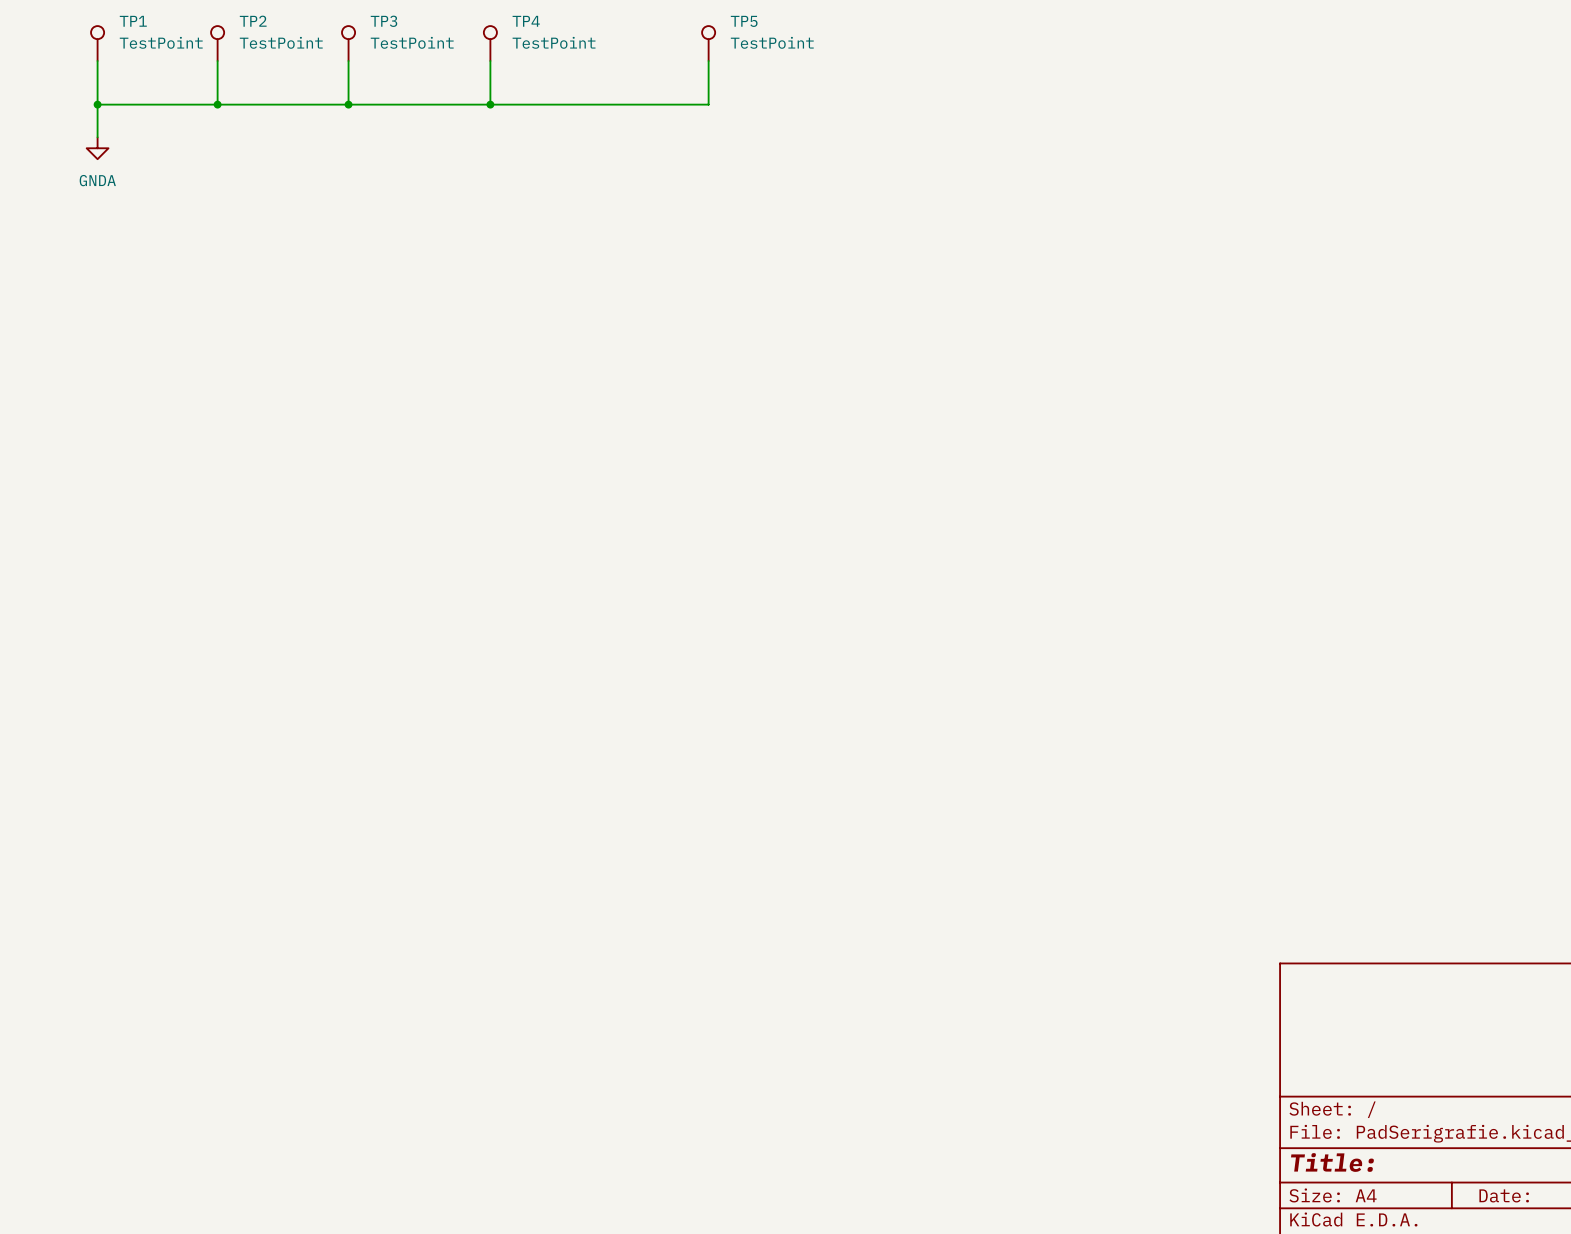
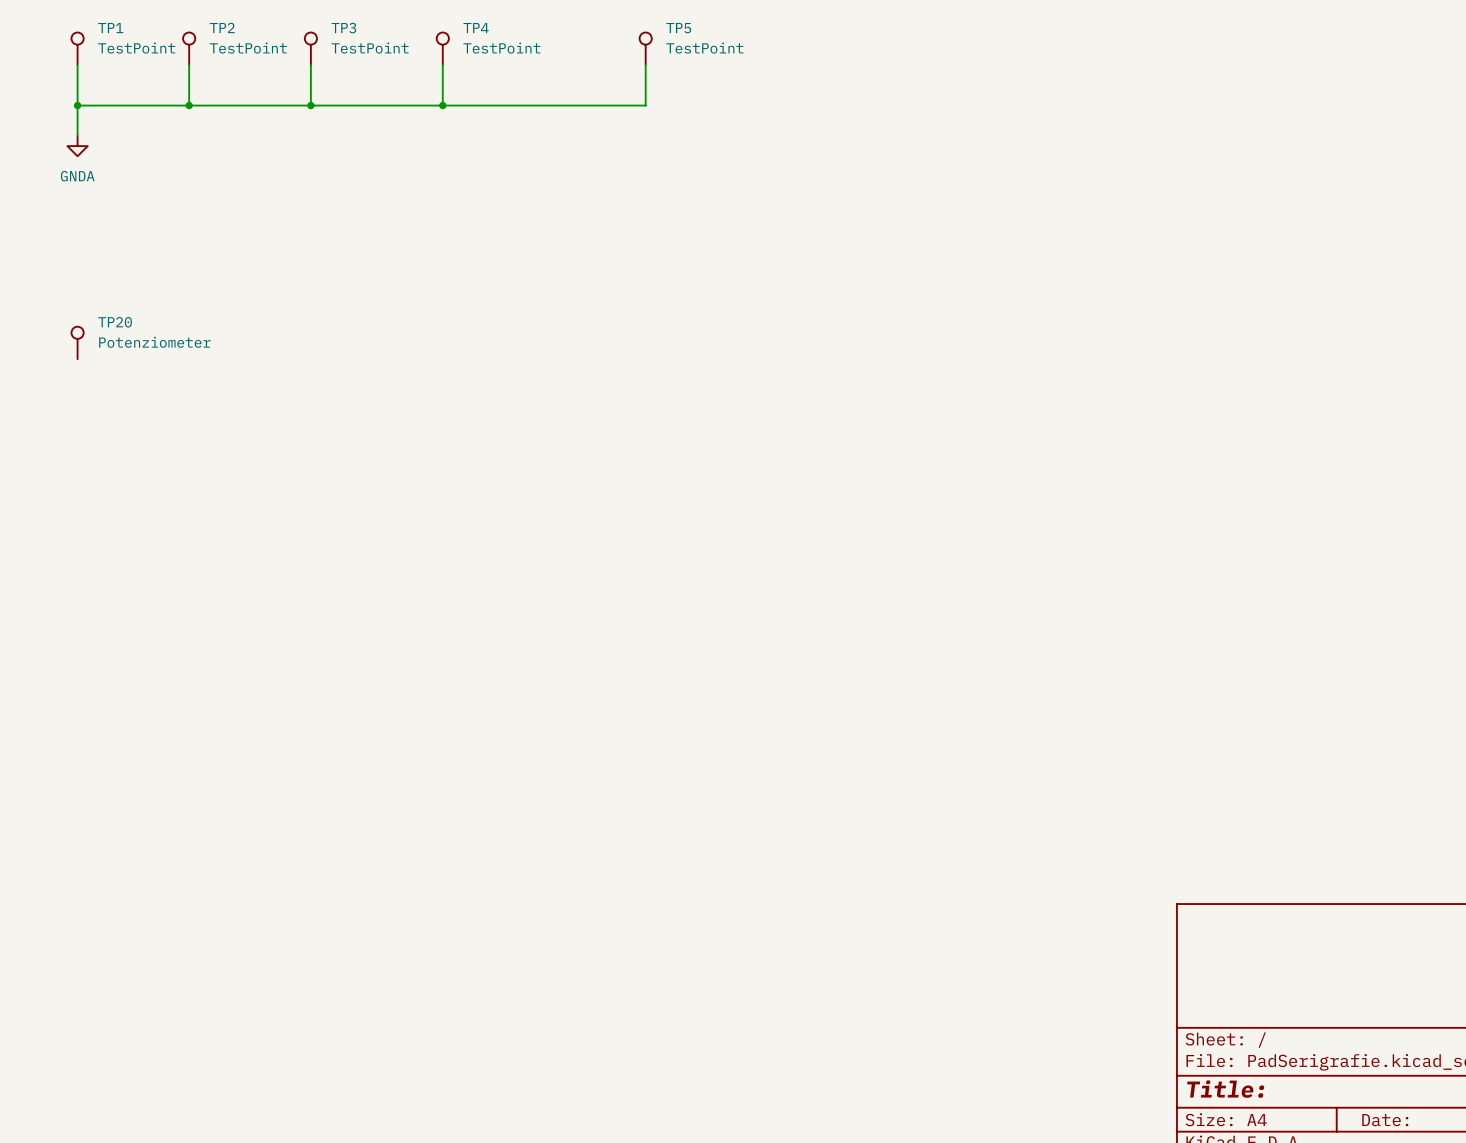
TP20: none -> Potenziometer (77, 342)

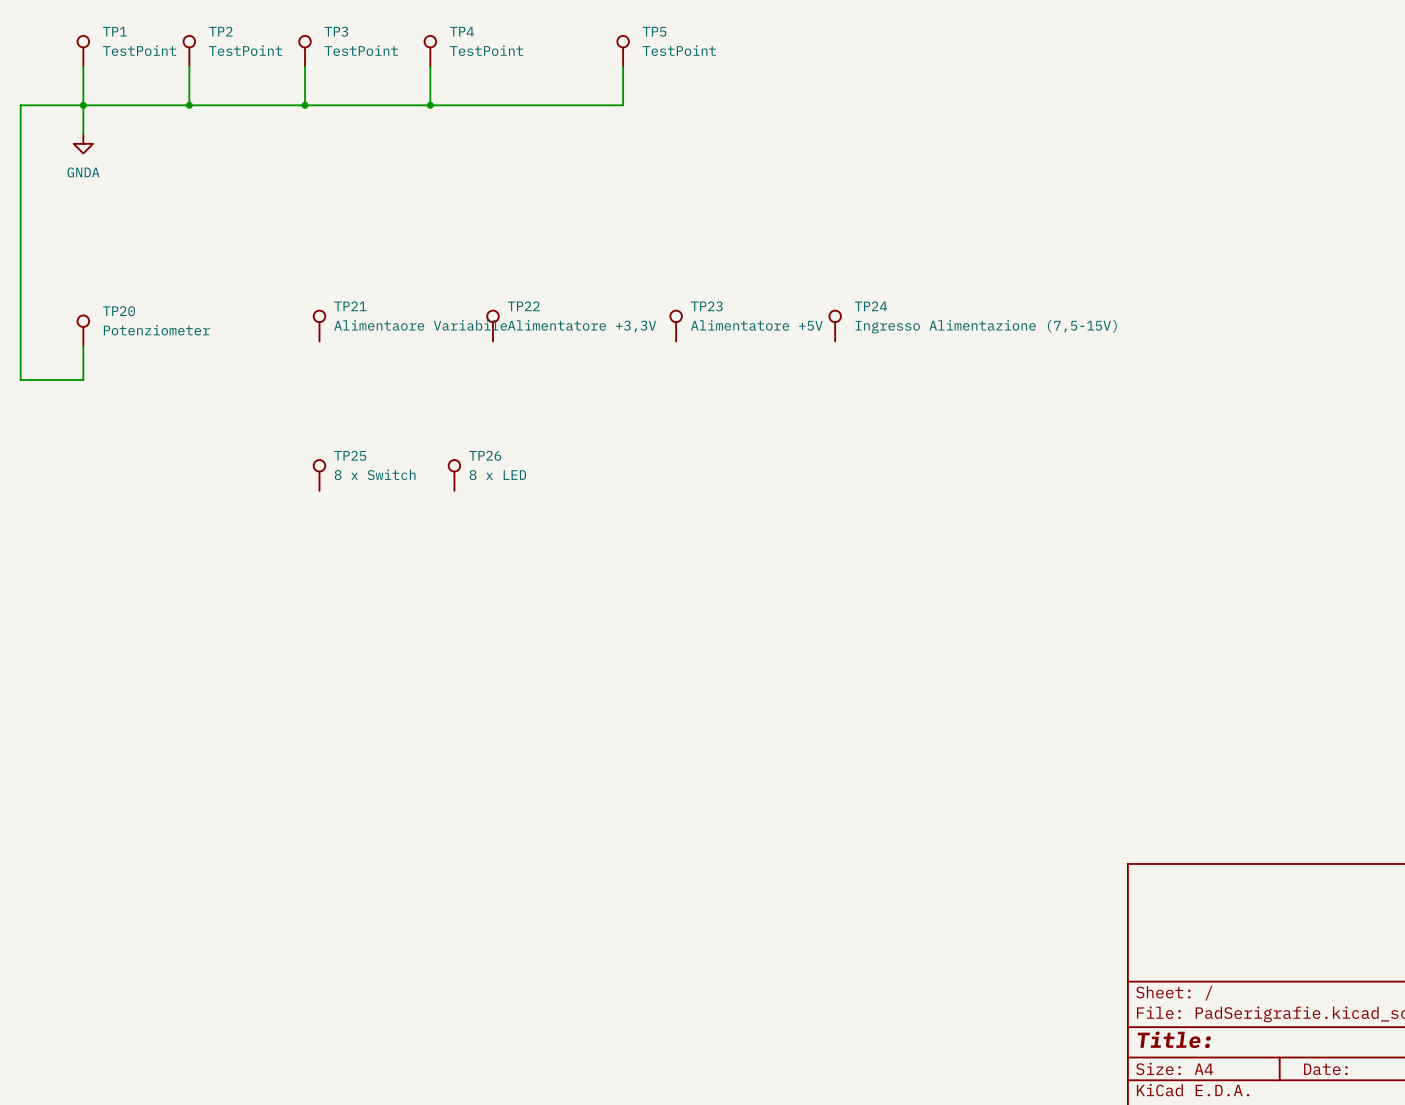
wire: none -> (83, 105) (20, 105) (20, 380) (83, 380) (83, 346)
TP21: none -> Alimentaore Variabile (319, 326)
TP22: none -> Alimentatore +3,3V (492, 326)
TP23: none -> Alimentatore +5V (676, 326)
TP24: none -> Ingresso Alimentazione (7,5-15V) (835, 326)
TP25: none -> 8 x Switch (319, 475)
TP26: none -> 8 x LED (454, 475)

